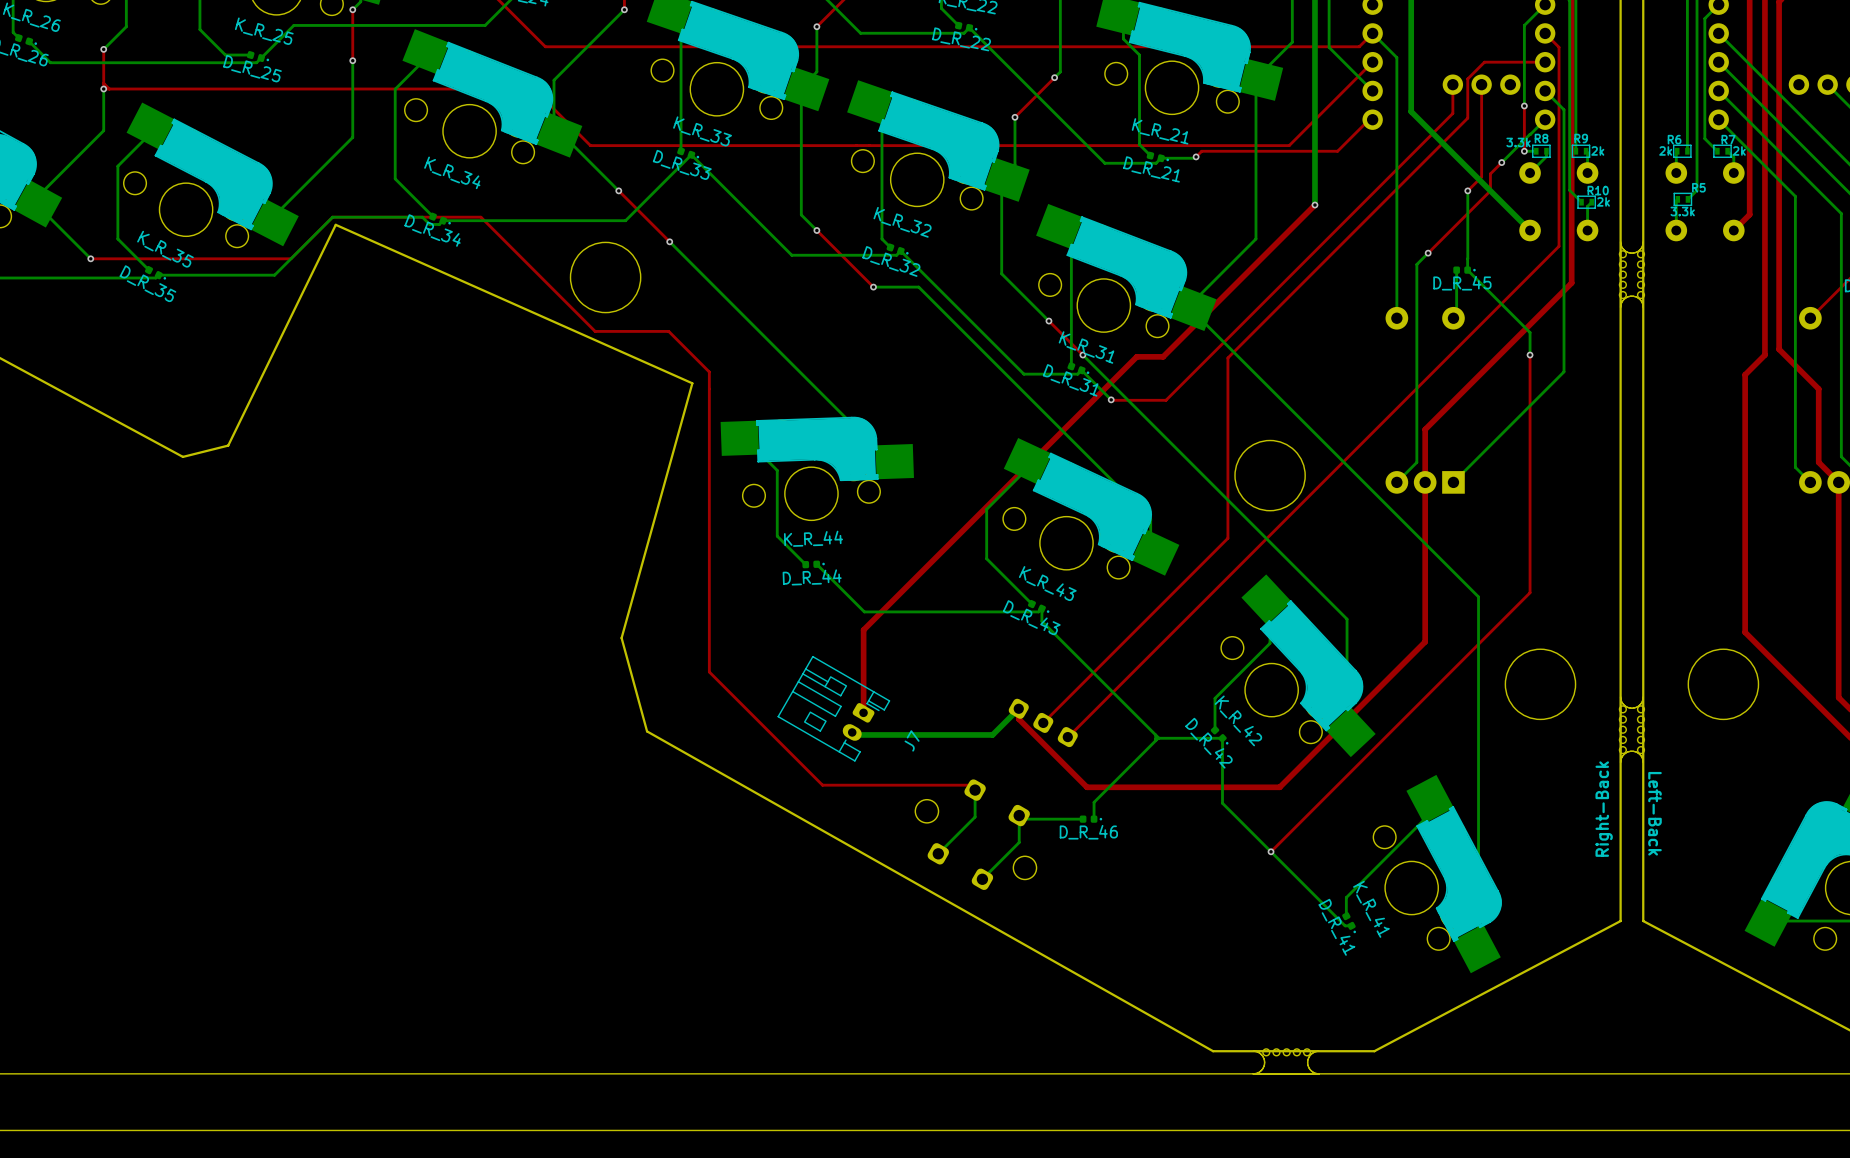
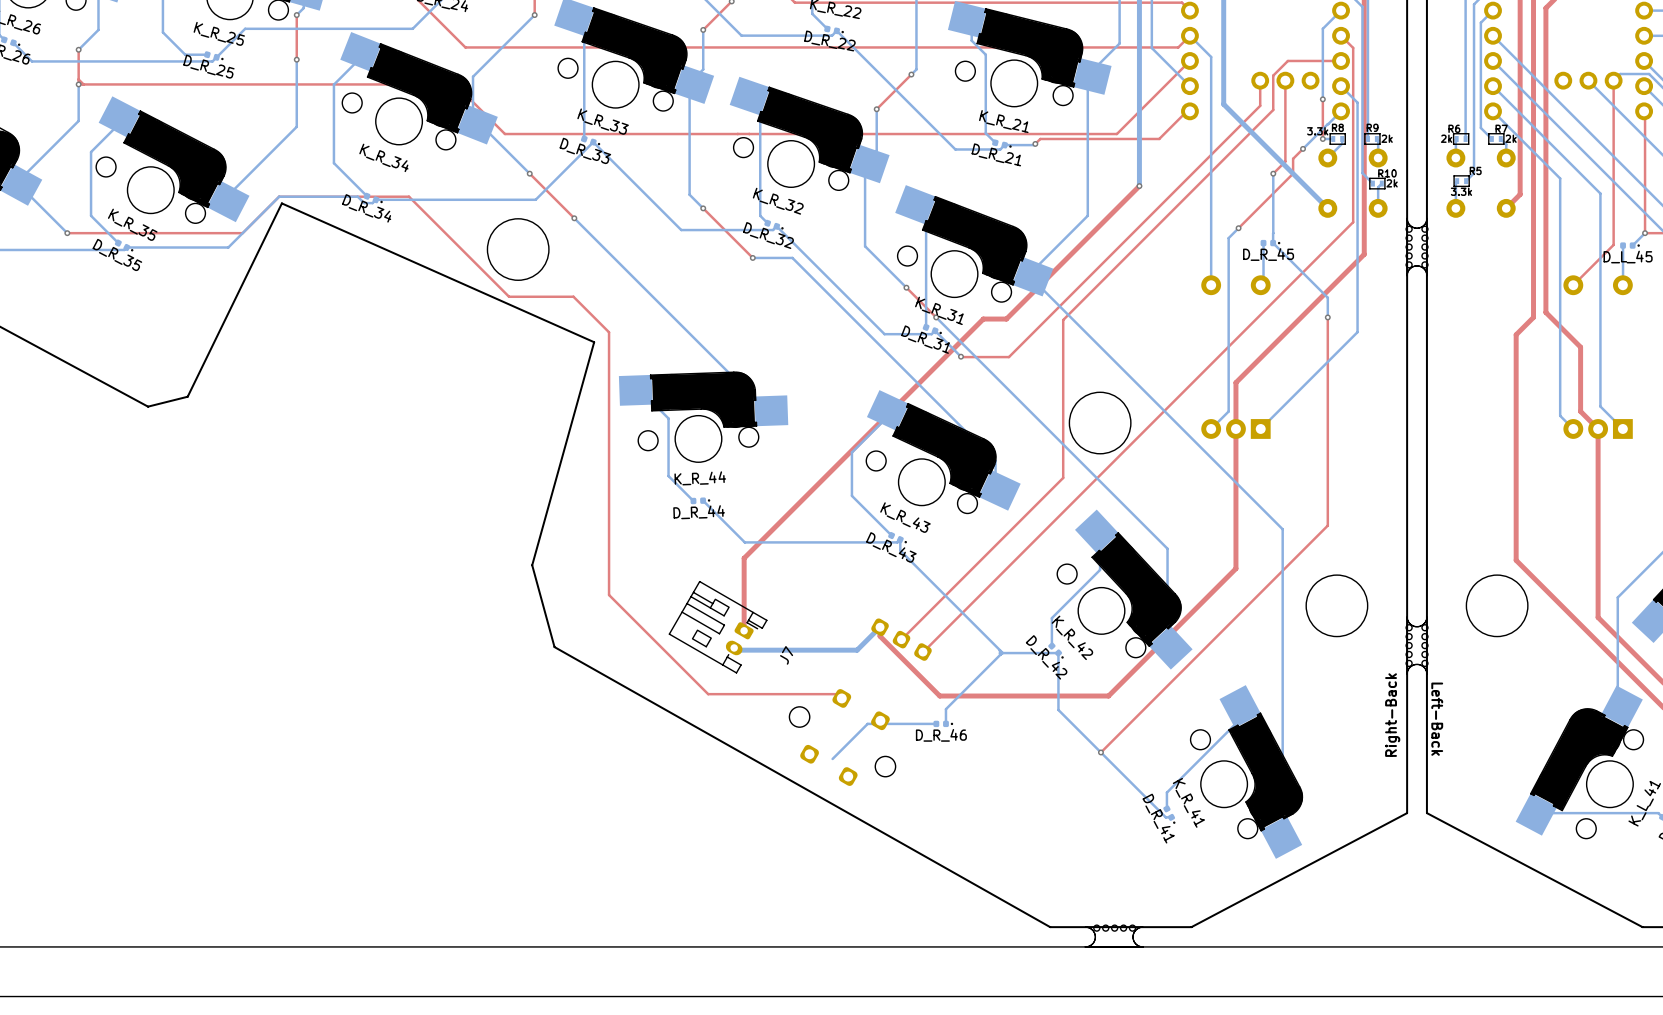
bottom track: (975, 790) (975, 817) (938, 853) -> none
bottom track: (1022, 819) (1019, 815) (1019, 842) (982, 879) -> (883, 723) (867, 723) (832, 758)

